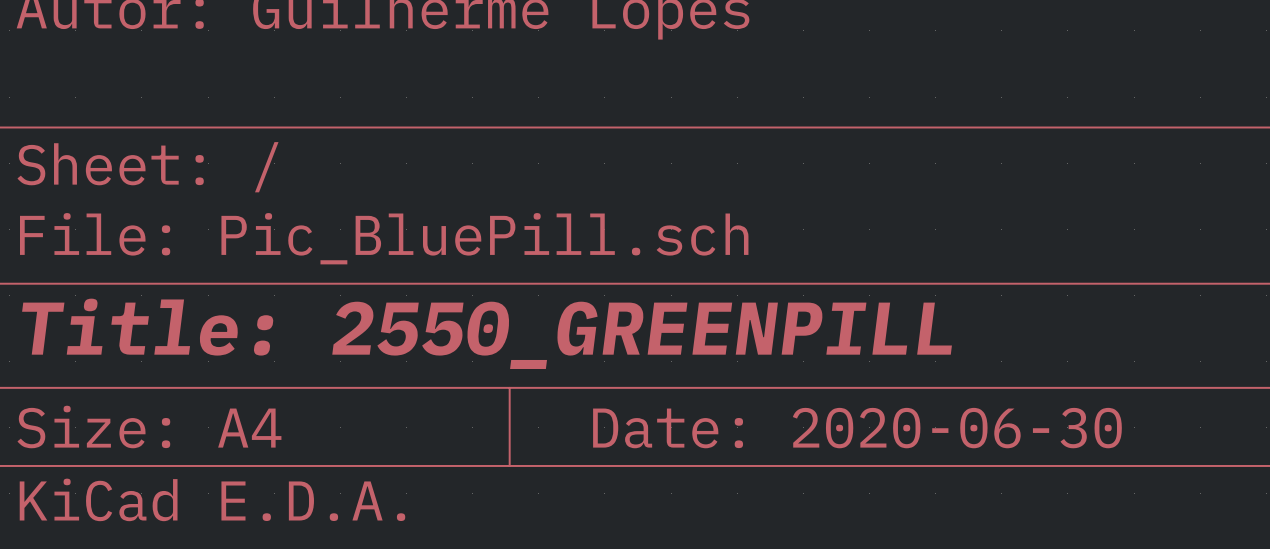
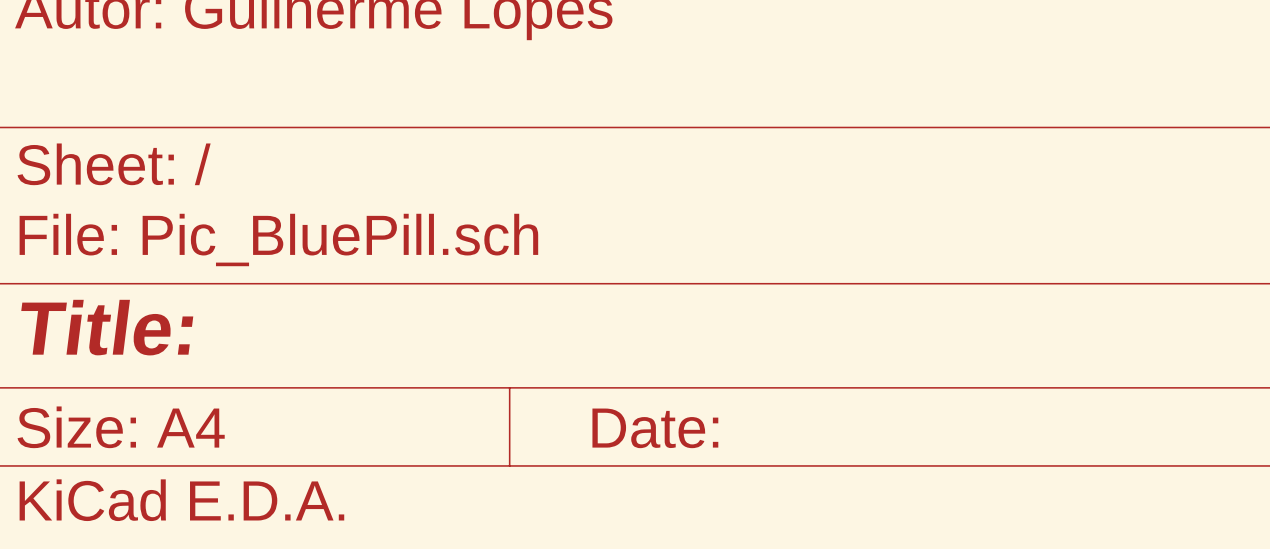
title block: Title: 2550_GREENPILL (487, 333) -> Title: (107, 327)
title block: Date: 2020-06-30 (857, 428) -> Date: (655, 428)

